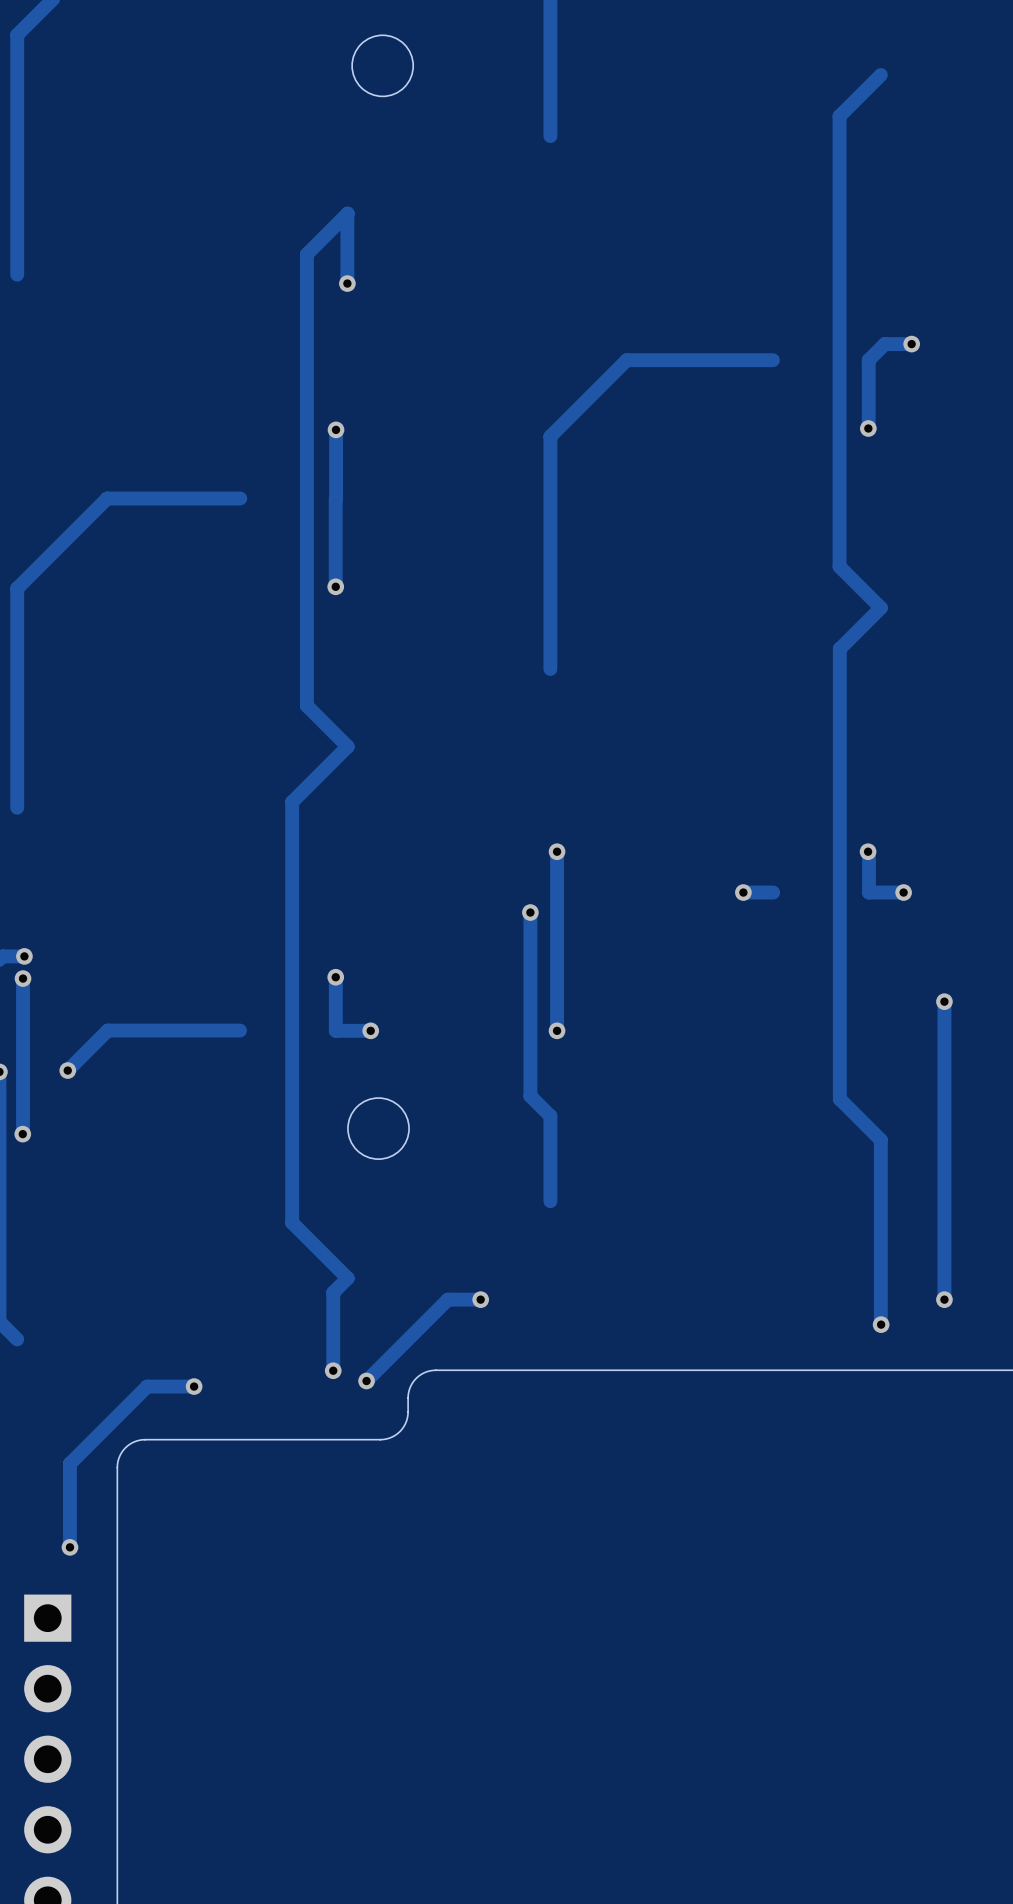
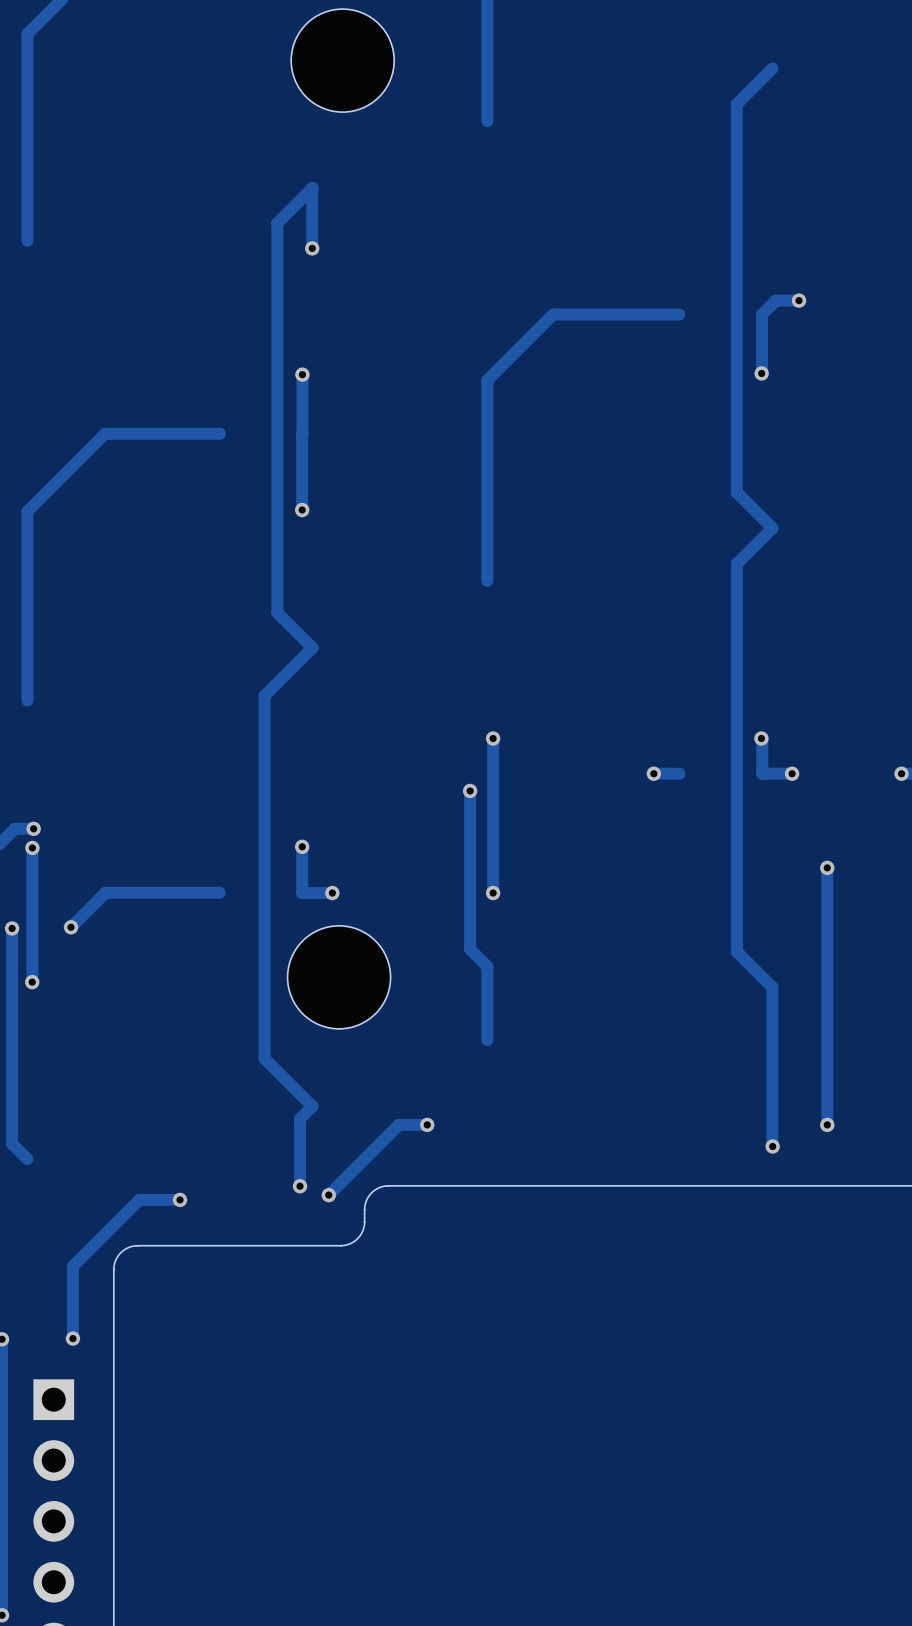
drawing: [351, 35, 414, 97] -> none
part: none -> (342, 60)
drawing: [347, 1097, 410, 1160] -> none
part: none -> (339, 977)

